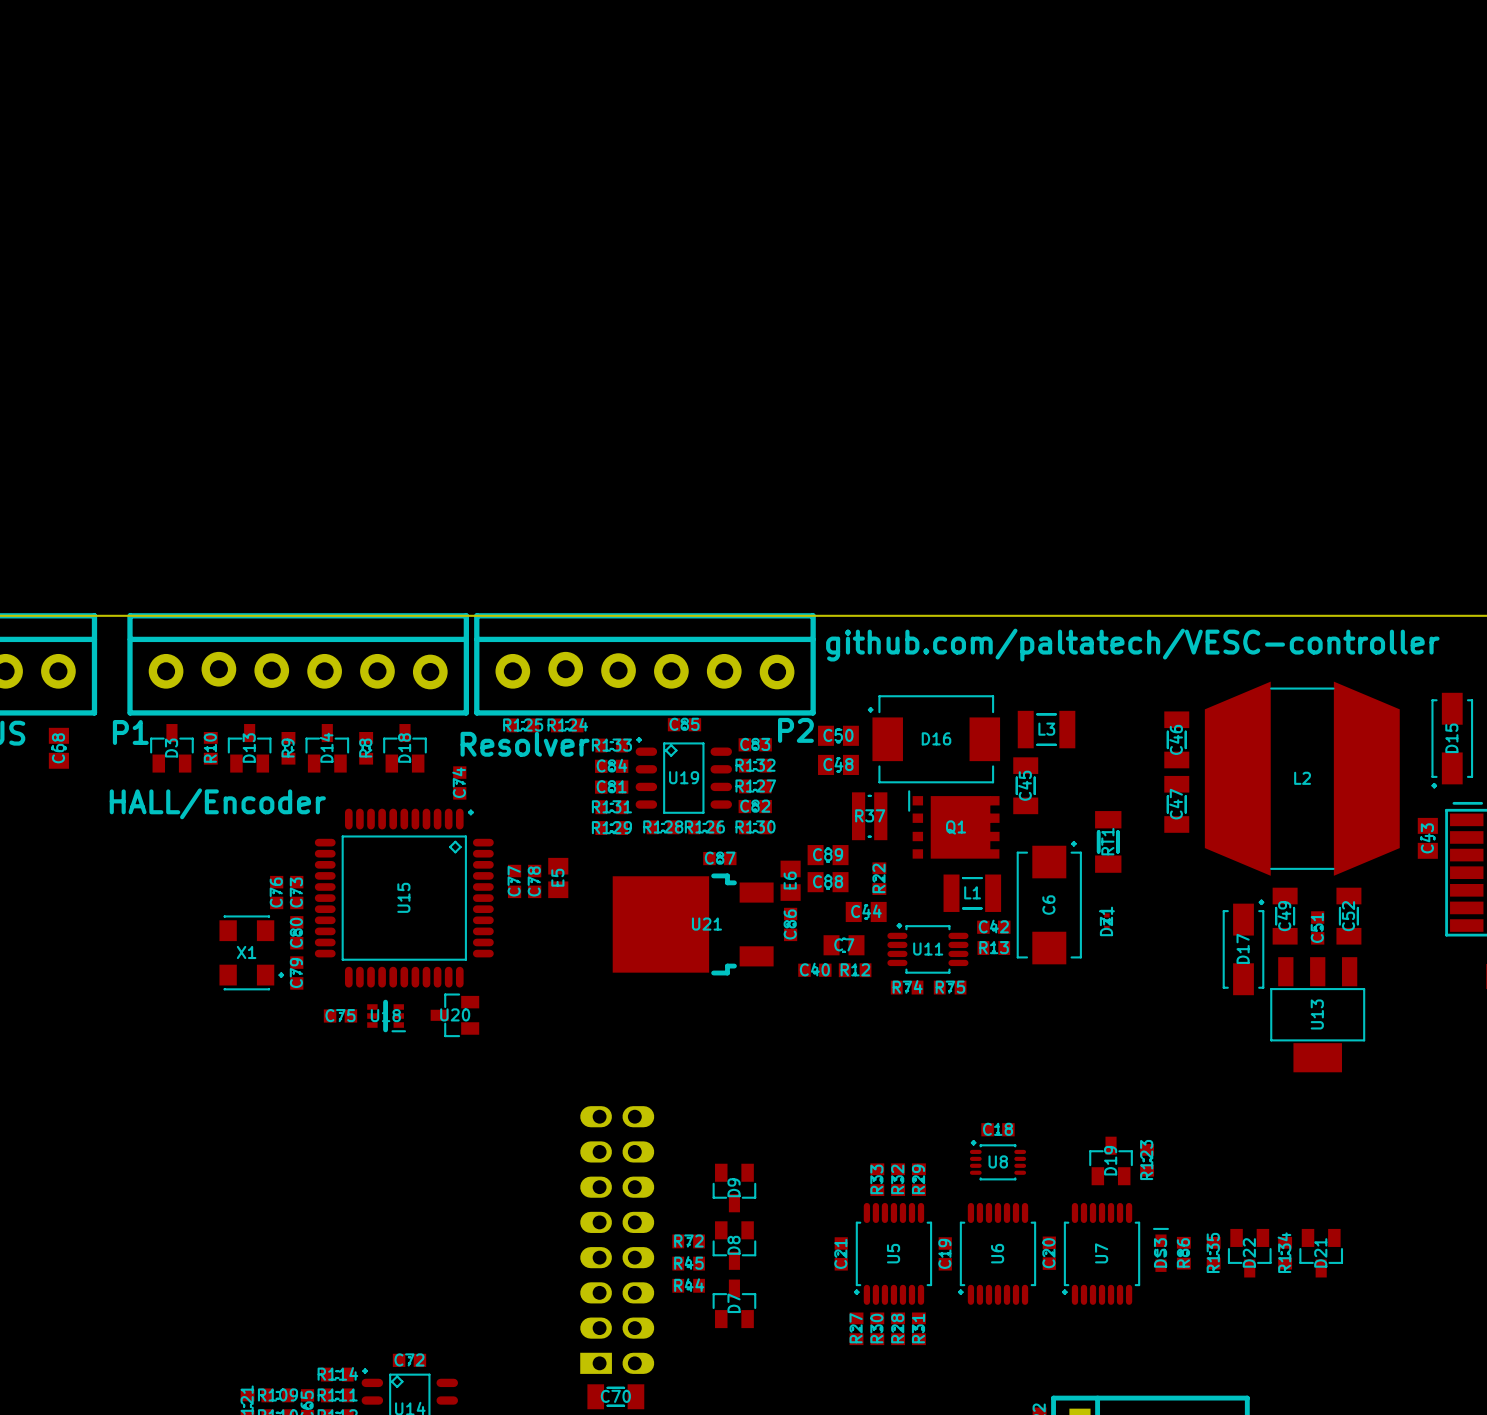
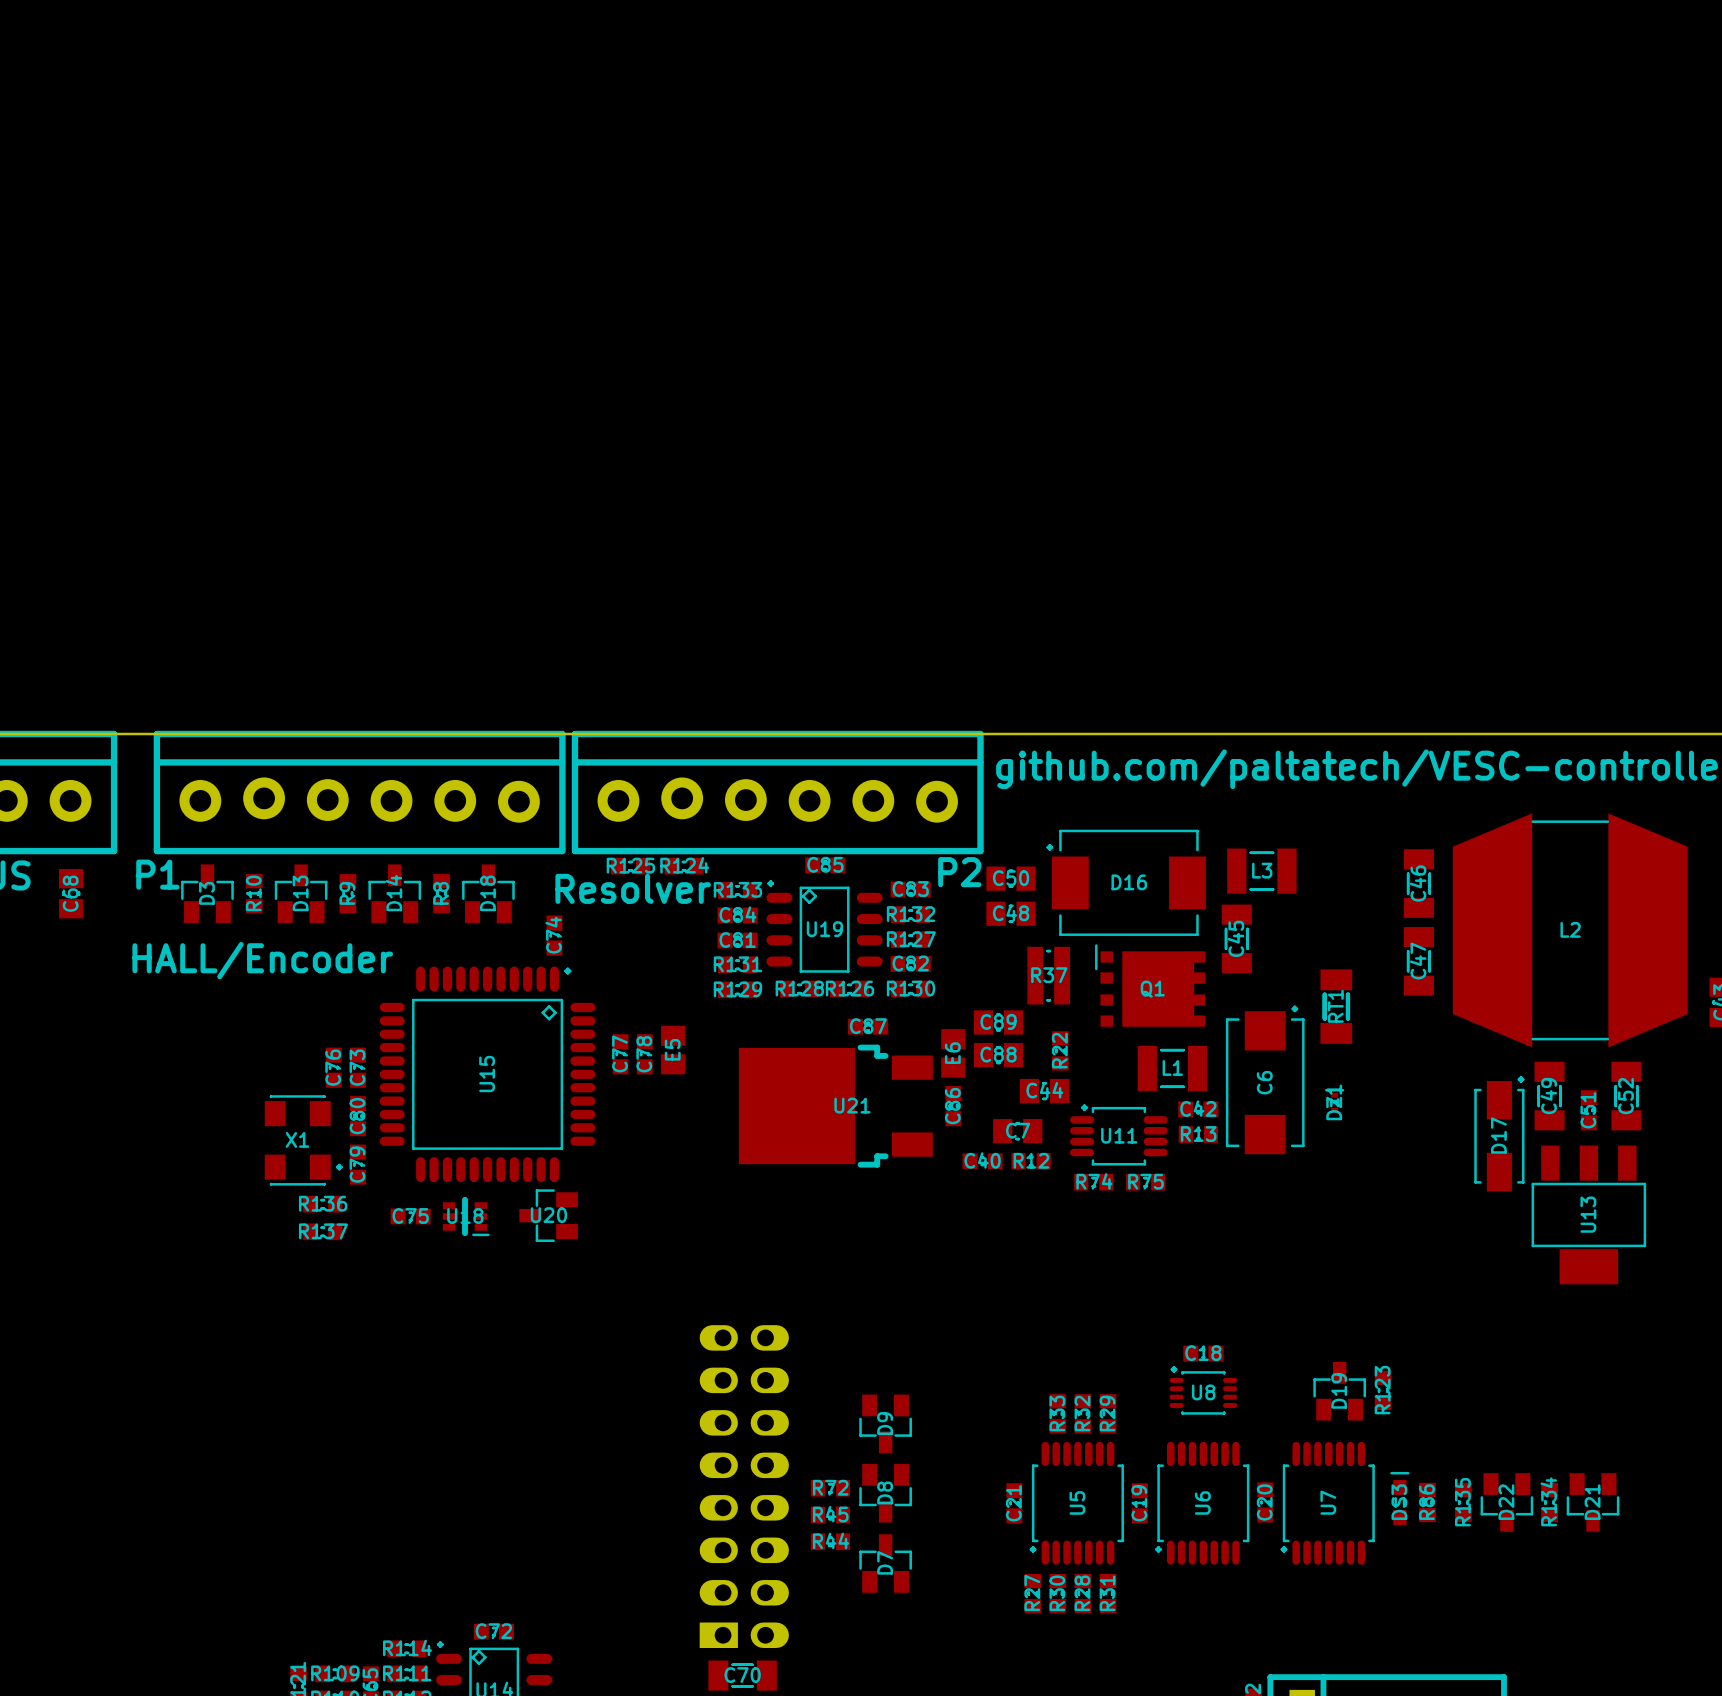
R136: none -> (322, 1204)
R137: none -> (322, 1231)

